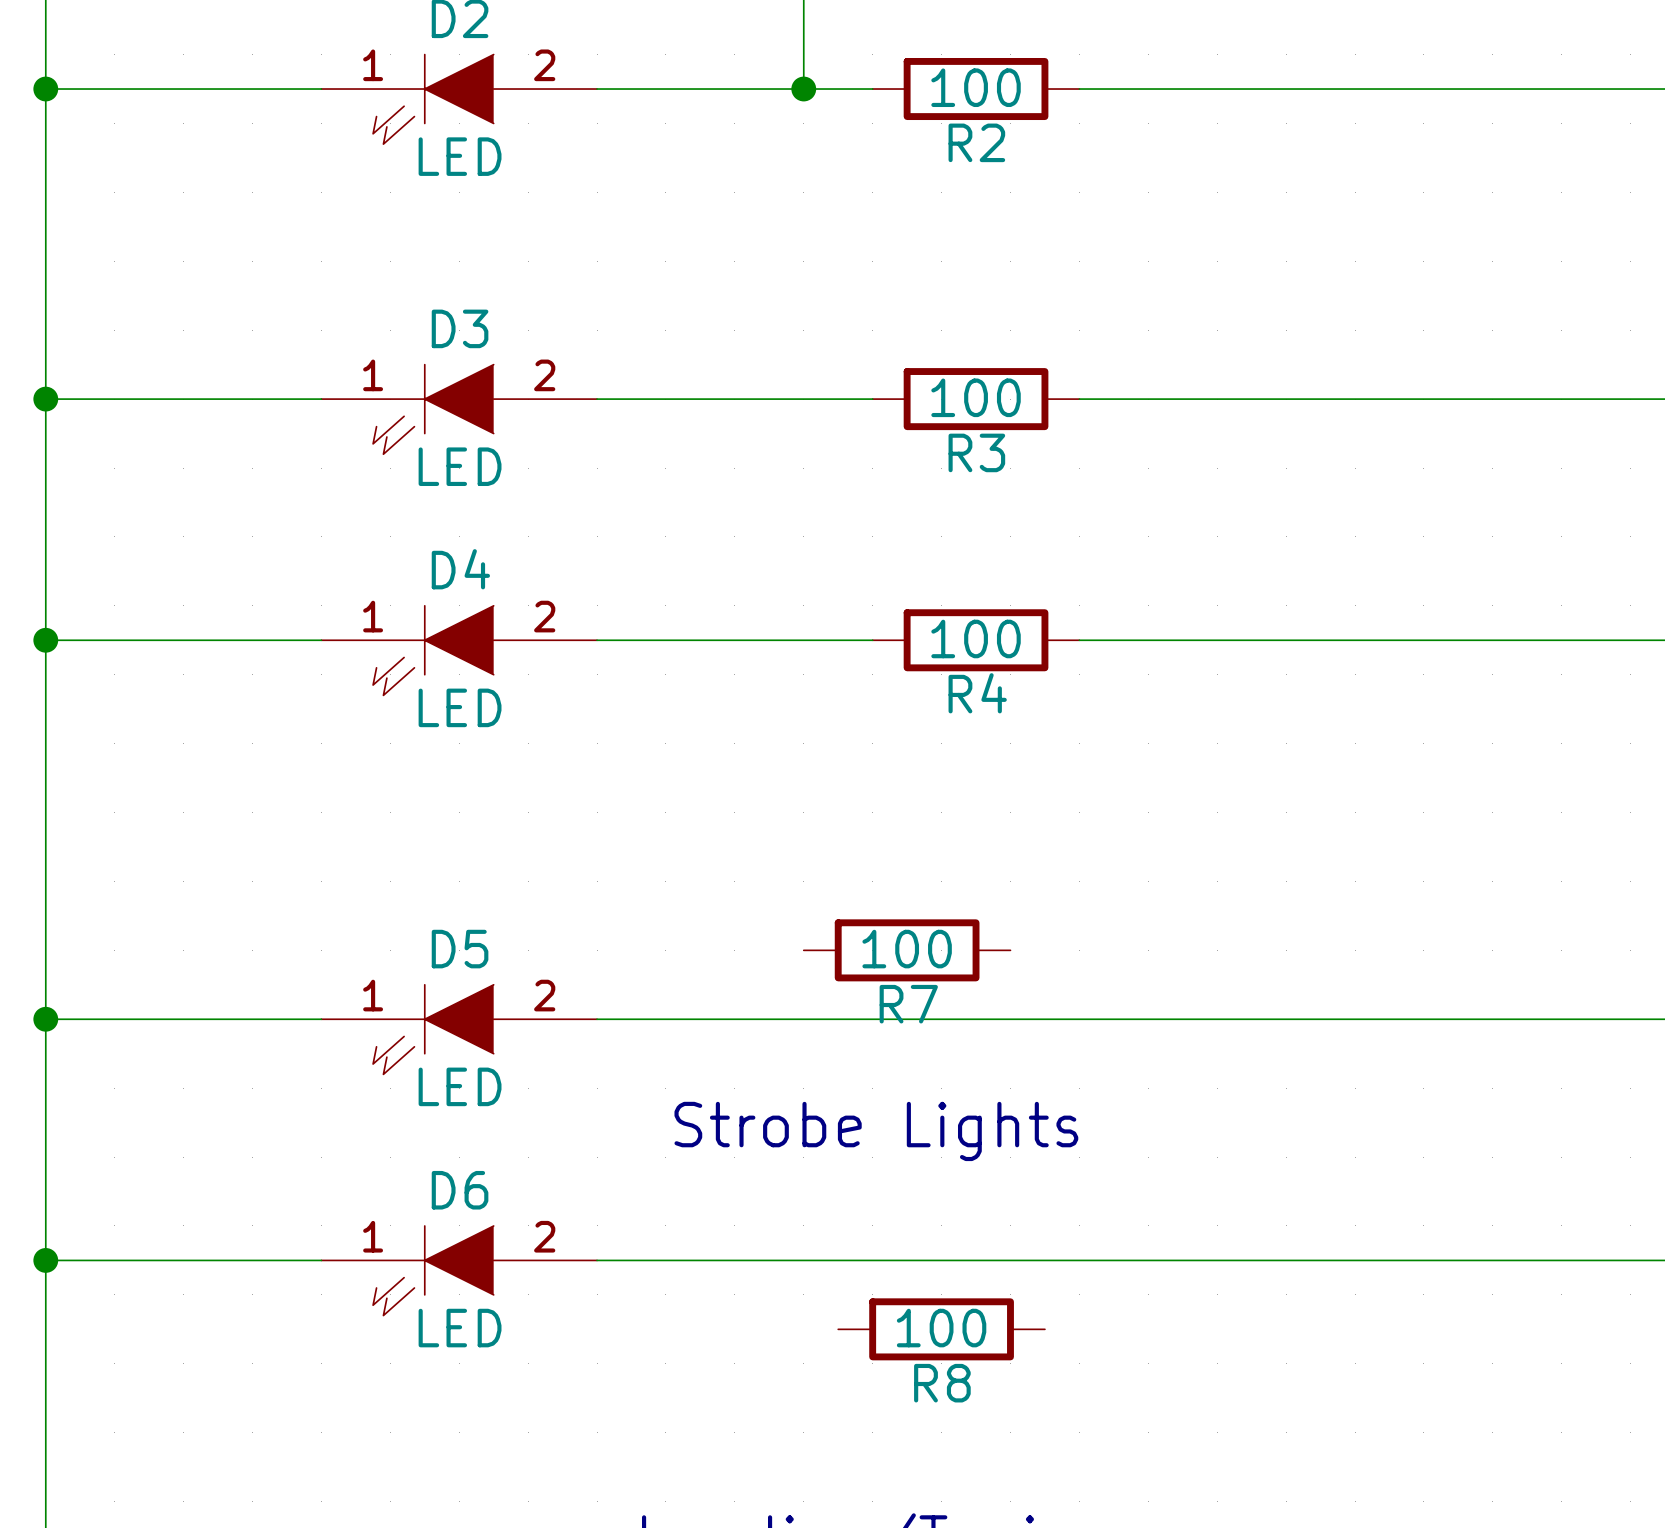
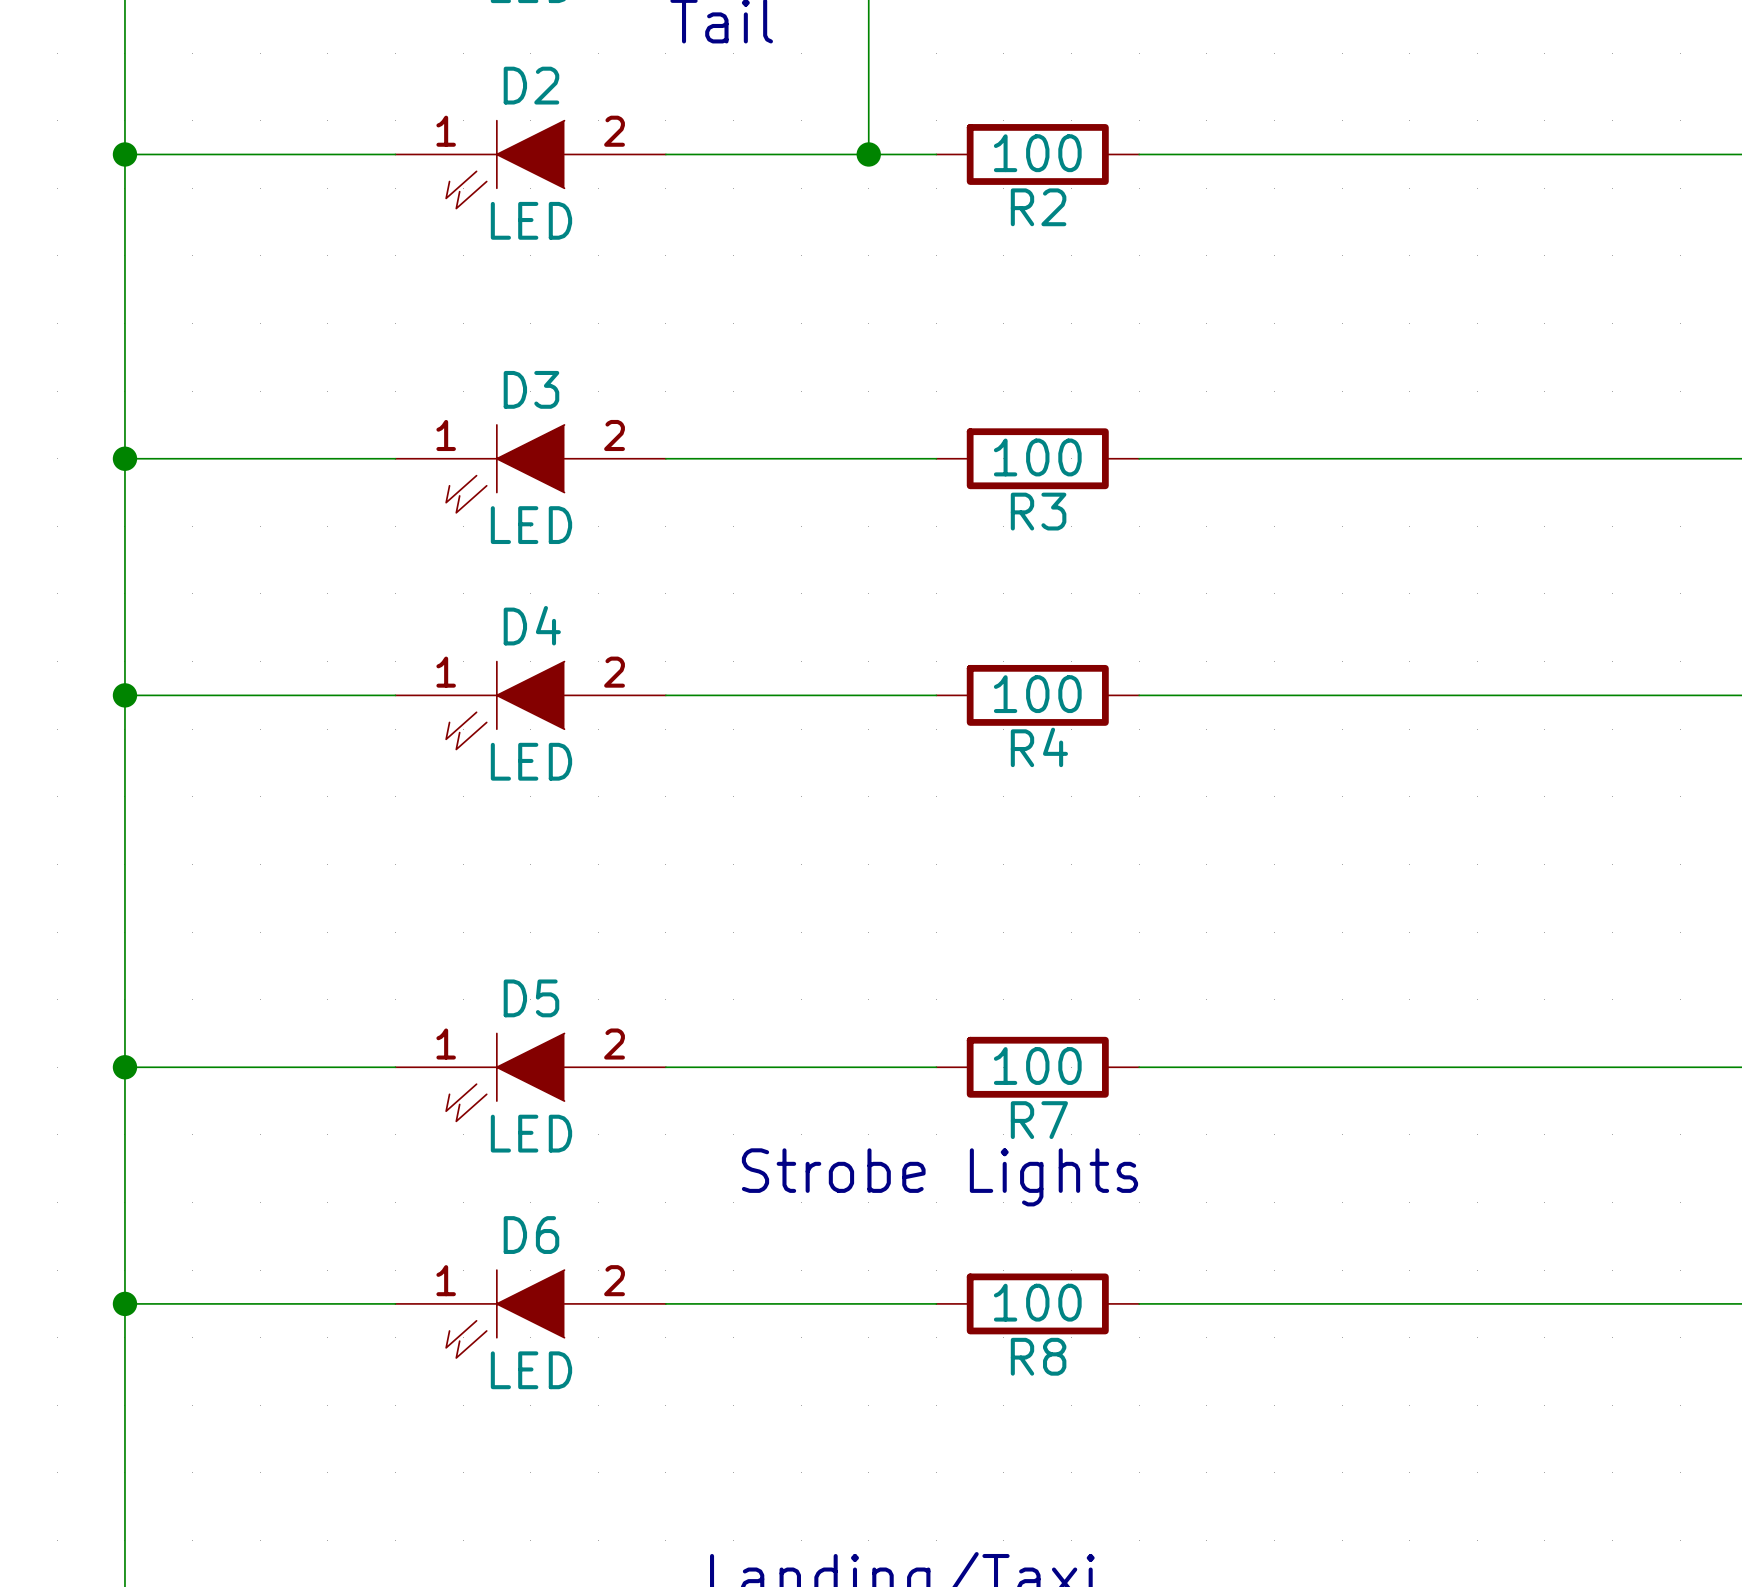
R7 position: (907, 950) -> (1037, 1067)
wire: (872, 1019) (1079, 1019) -> none
wire: (872, 1260) (1079, 1260) -> none
R8 position: (941, 1329) -> (1037, 1303)

